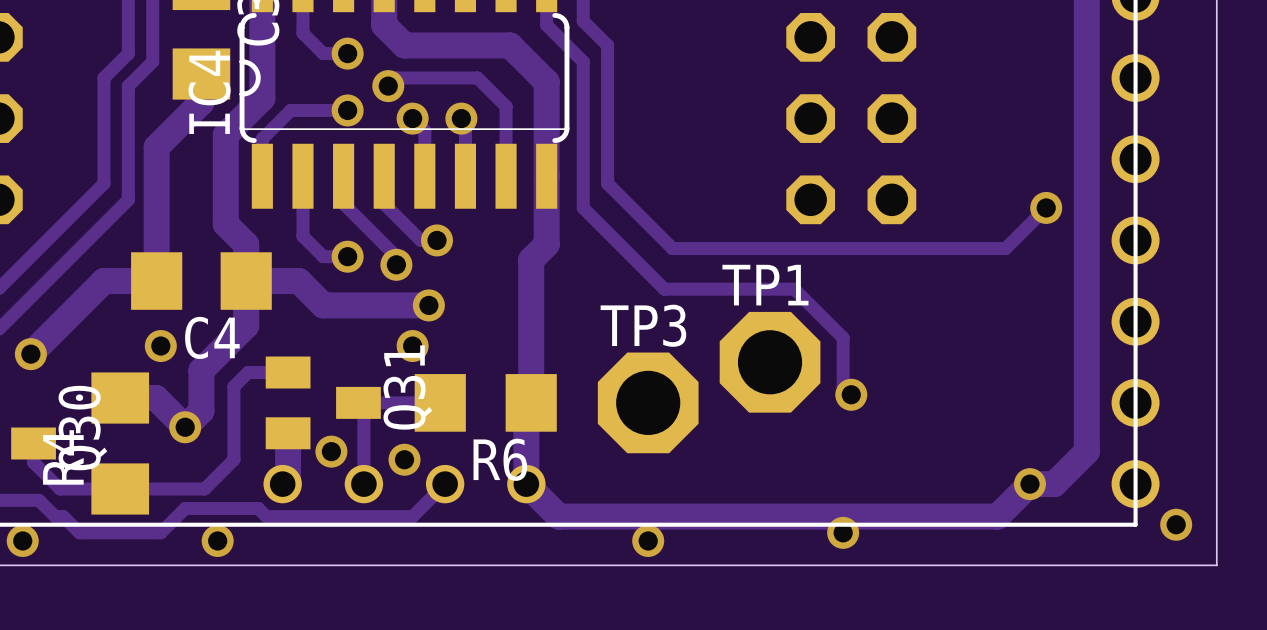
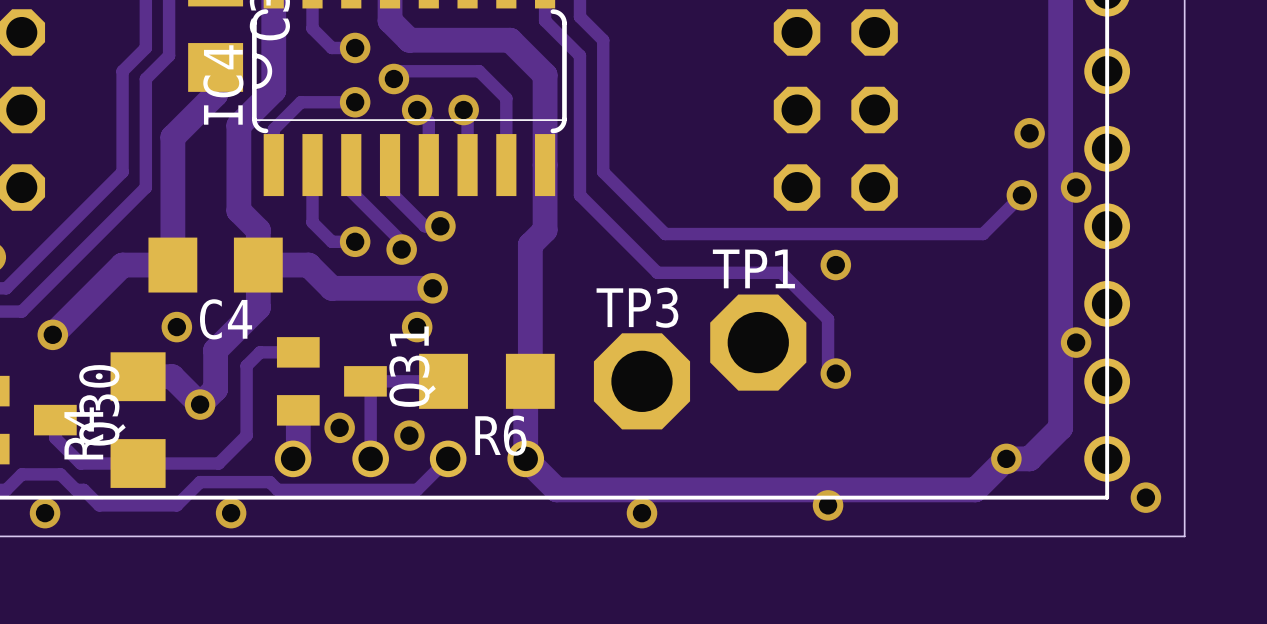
via: none -> (1029, 133)
via: none -> (1076, 187)
via: none -> (835, 265)
via: none -> (1076, 342)

